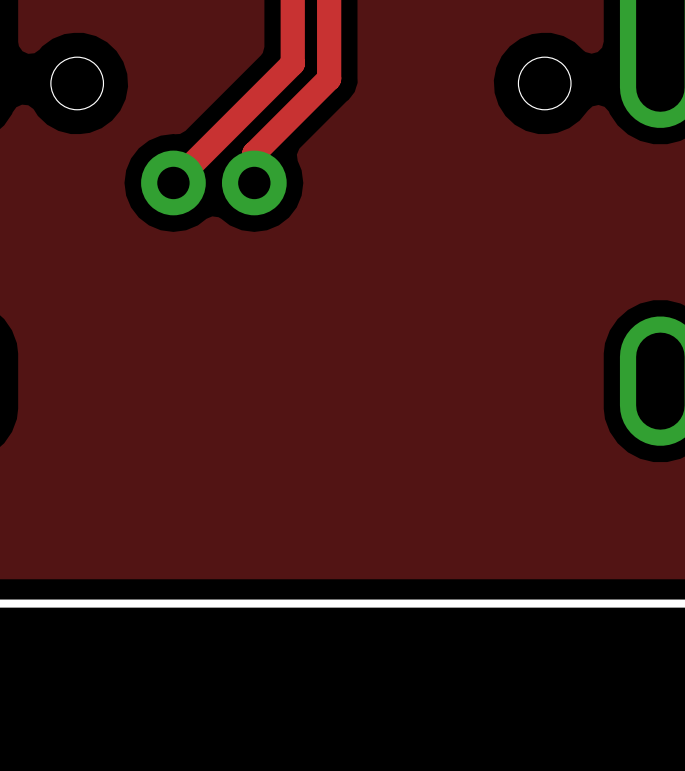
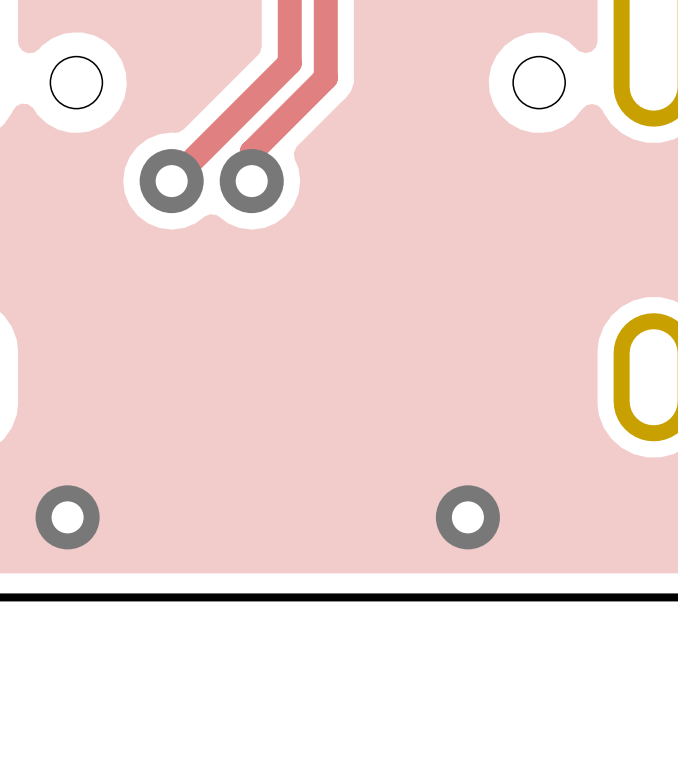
via: none -> (67, 517)
via: none -> (467, 517)

